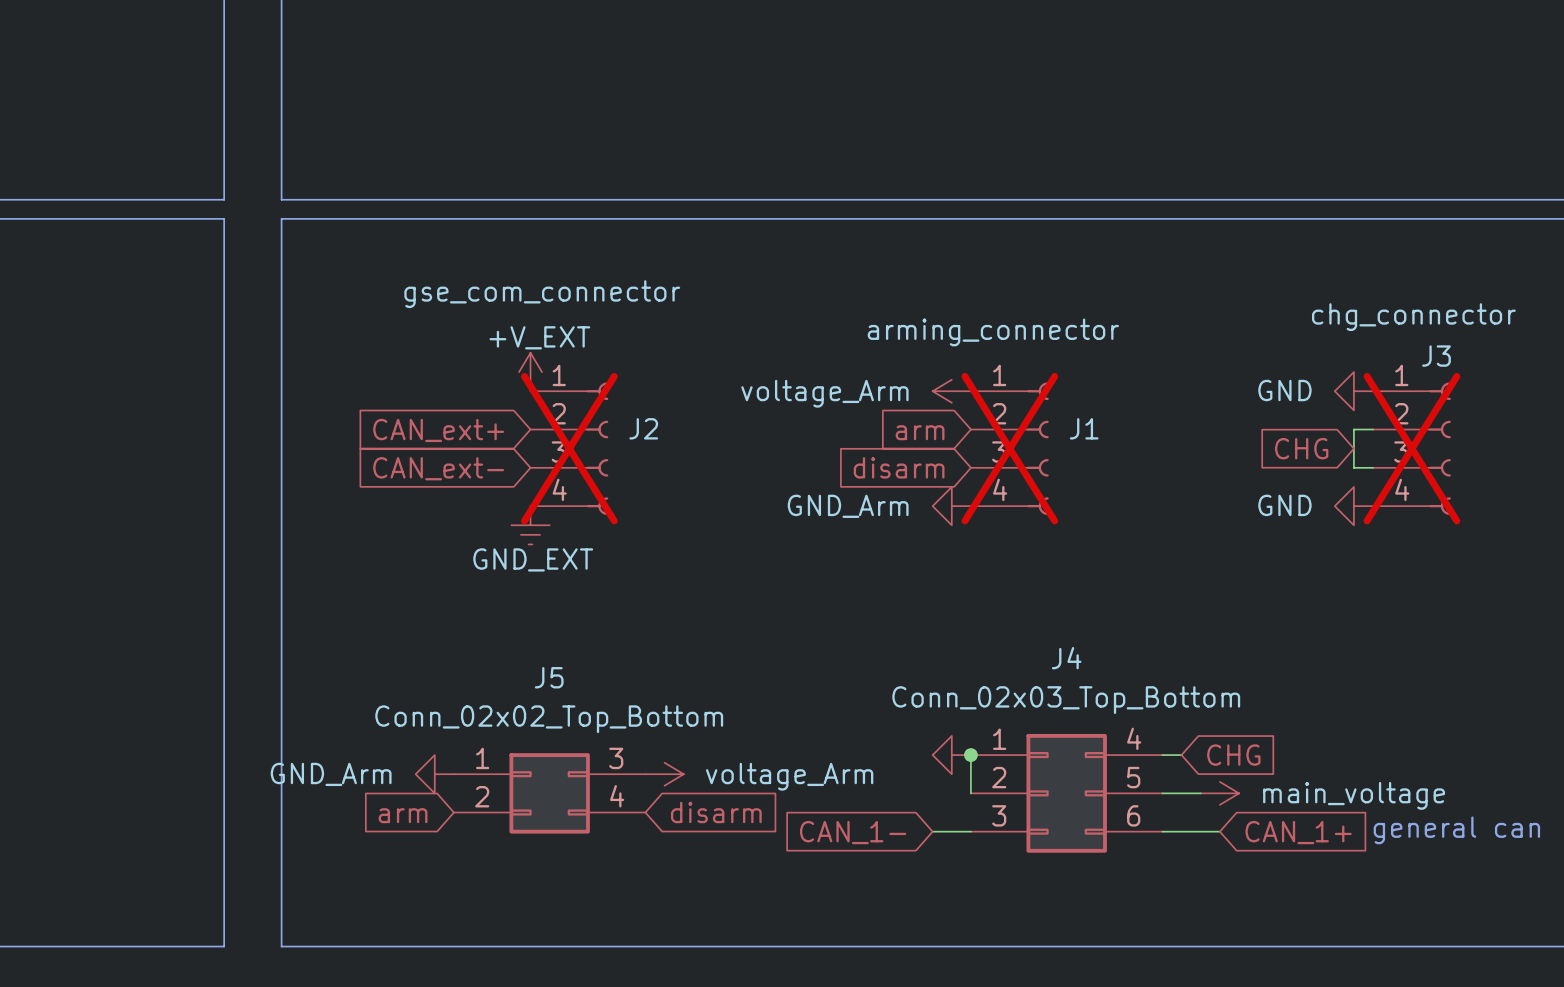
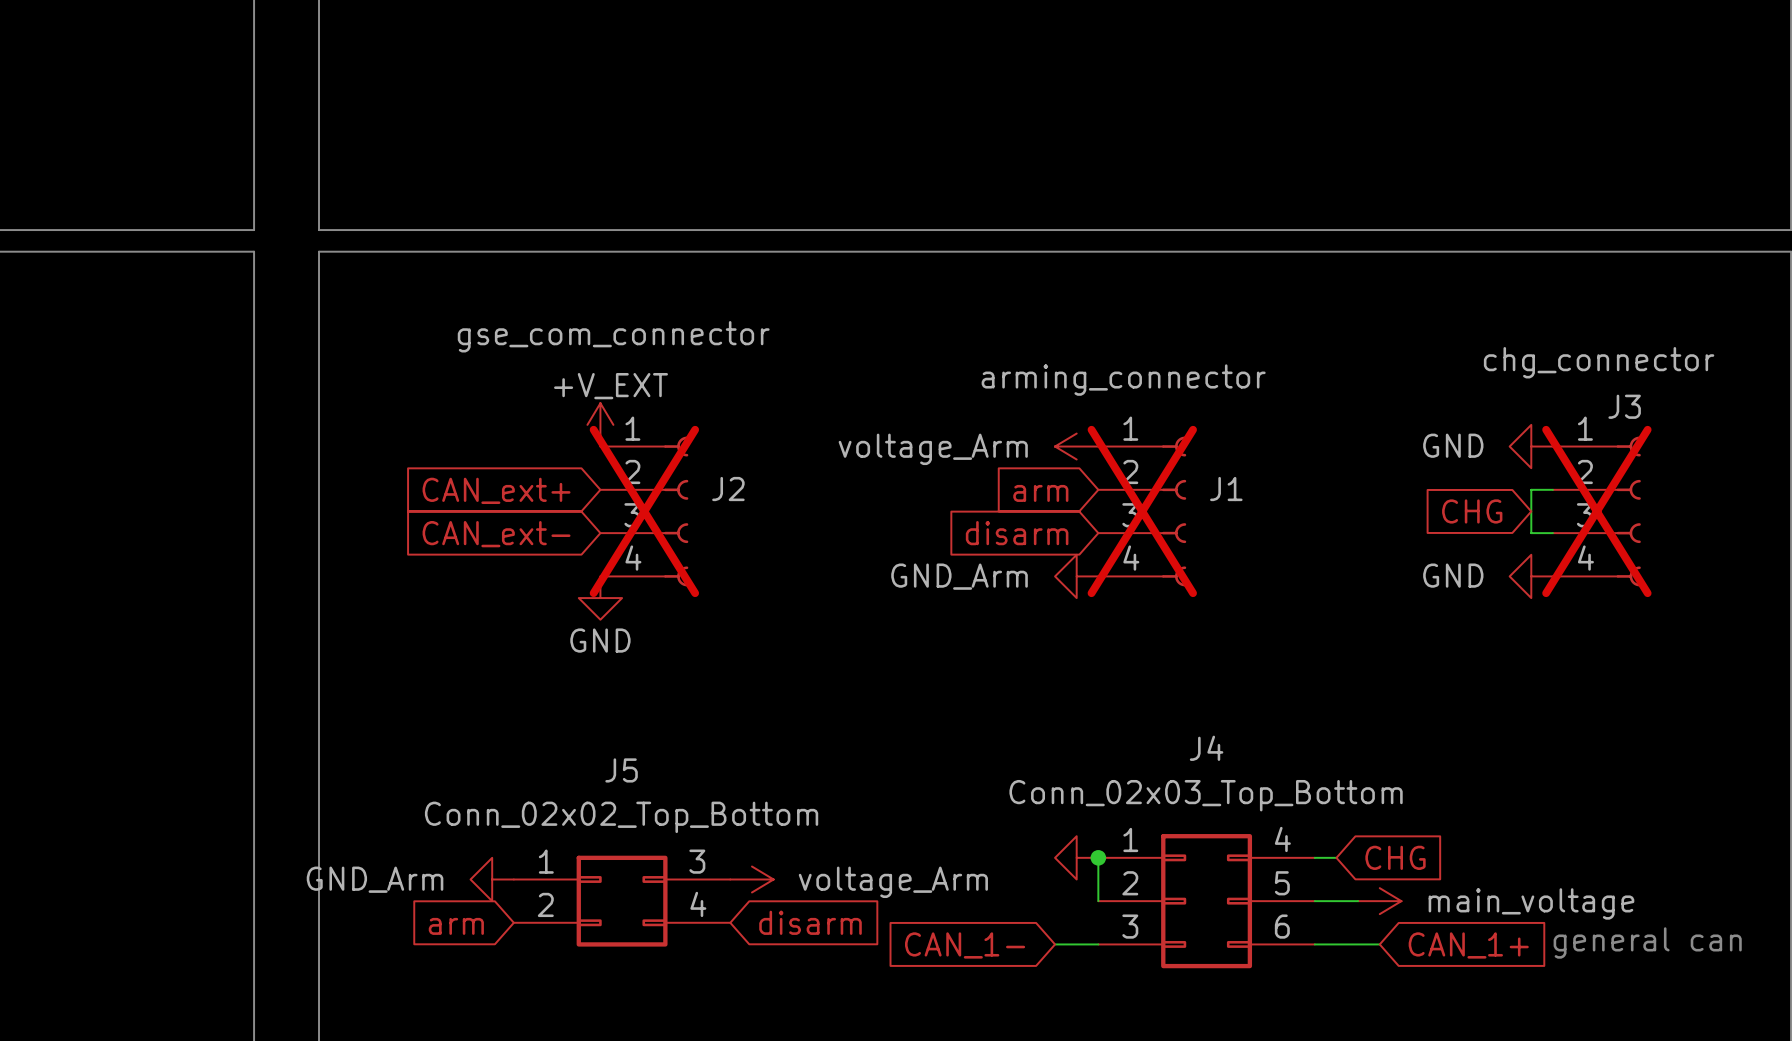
power symbol: GND_EXT (530, 525) -> GND (600, 598)

